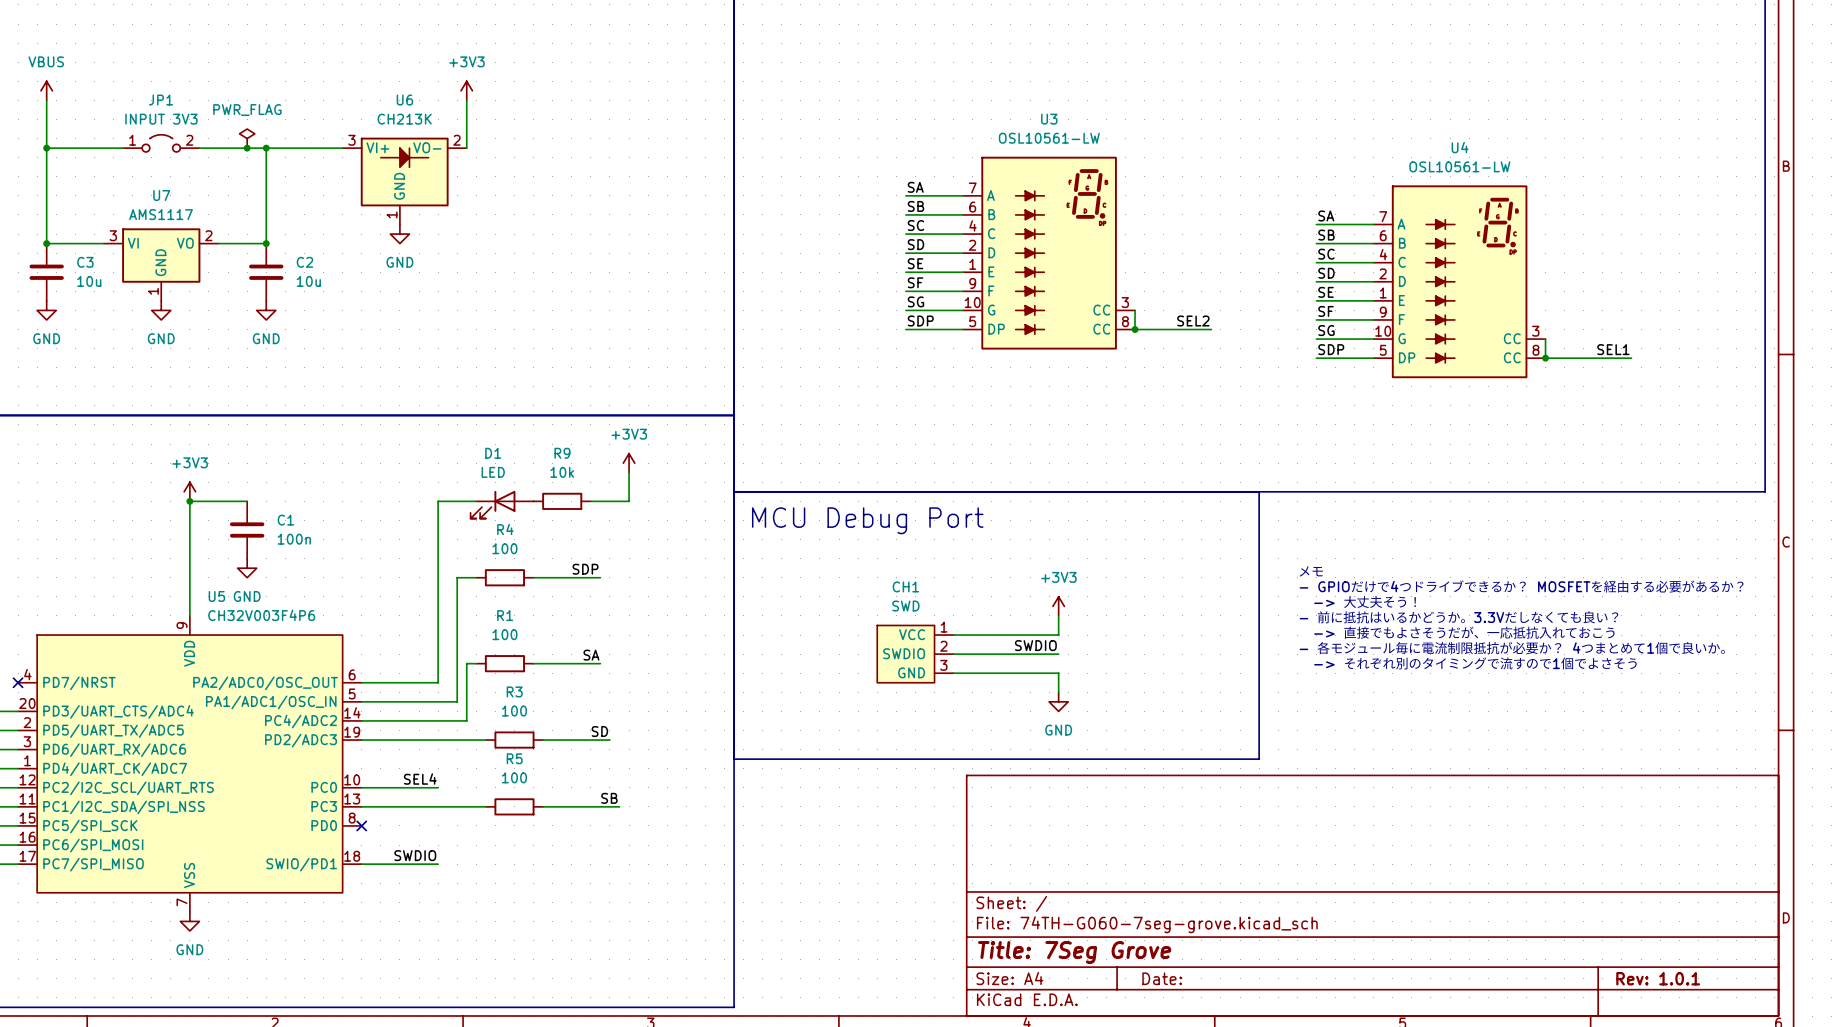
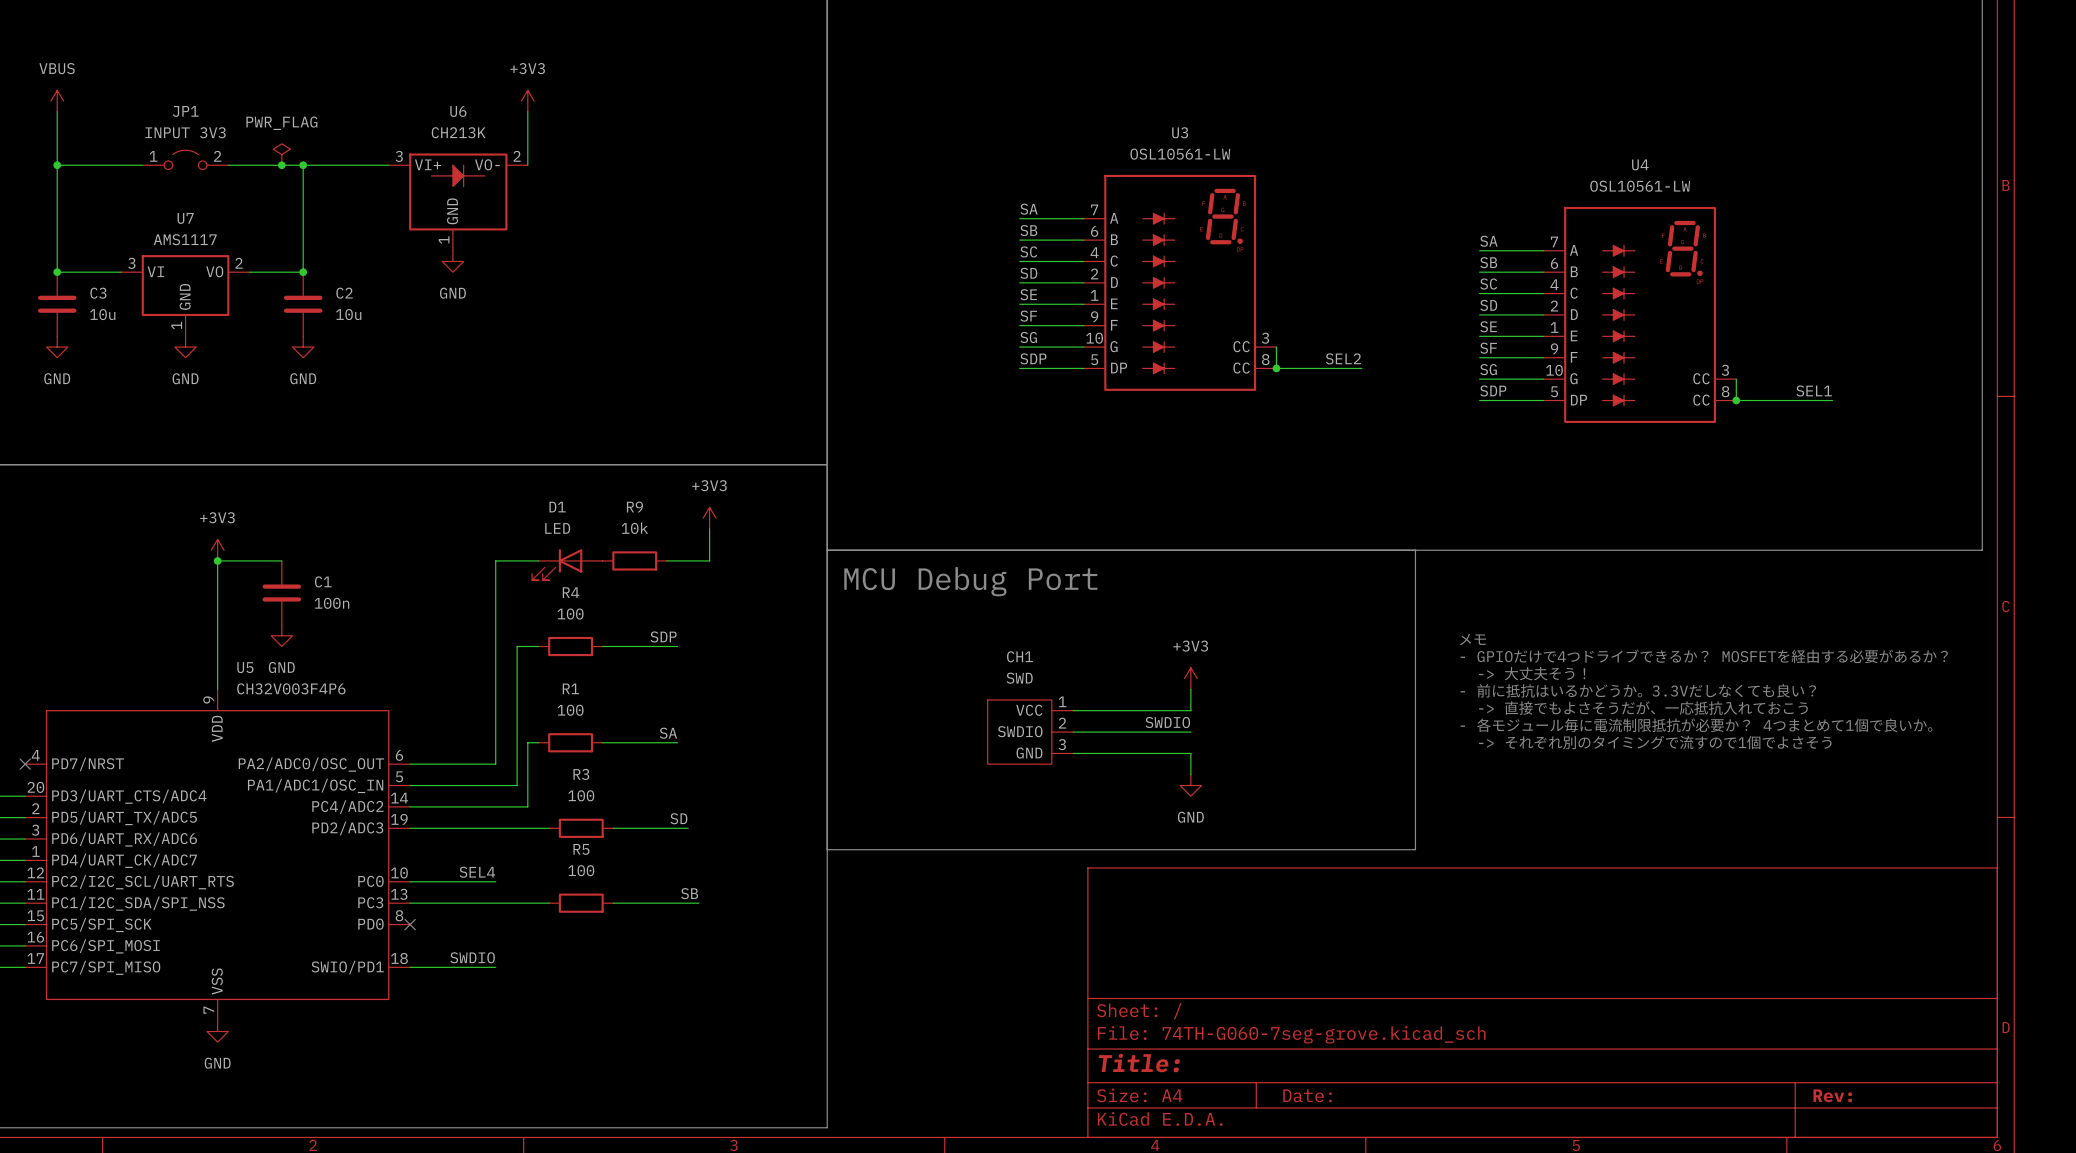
title block: Title: 7Seg Grove (1074, 952) -> Title: (1139, 1063)
title block: Rev: 1.0.1 (1658, 978) -> Rev: (1832, 1095)

